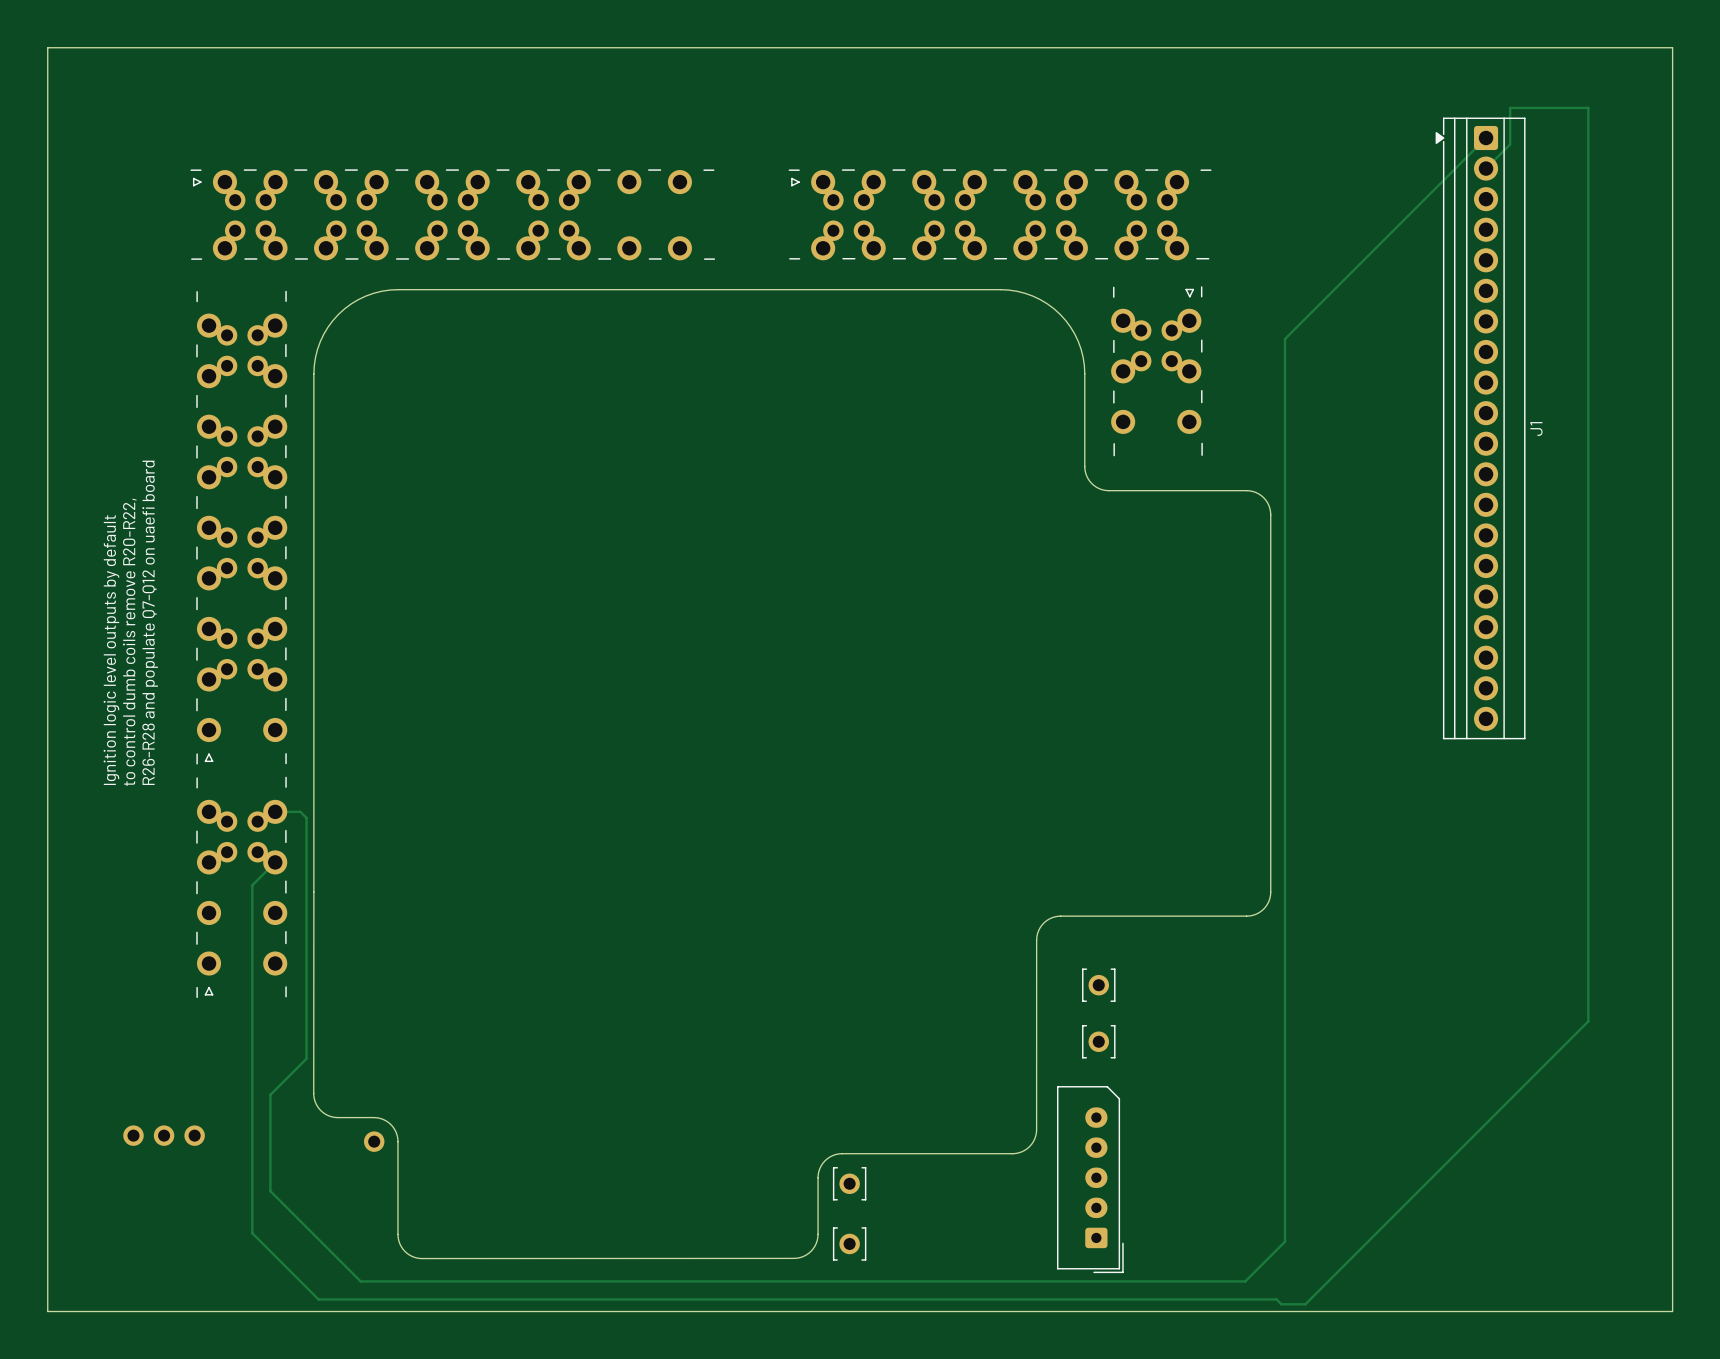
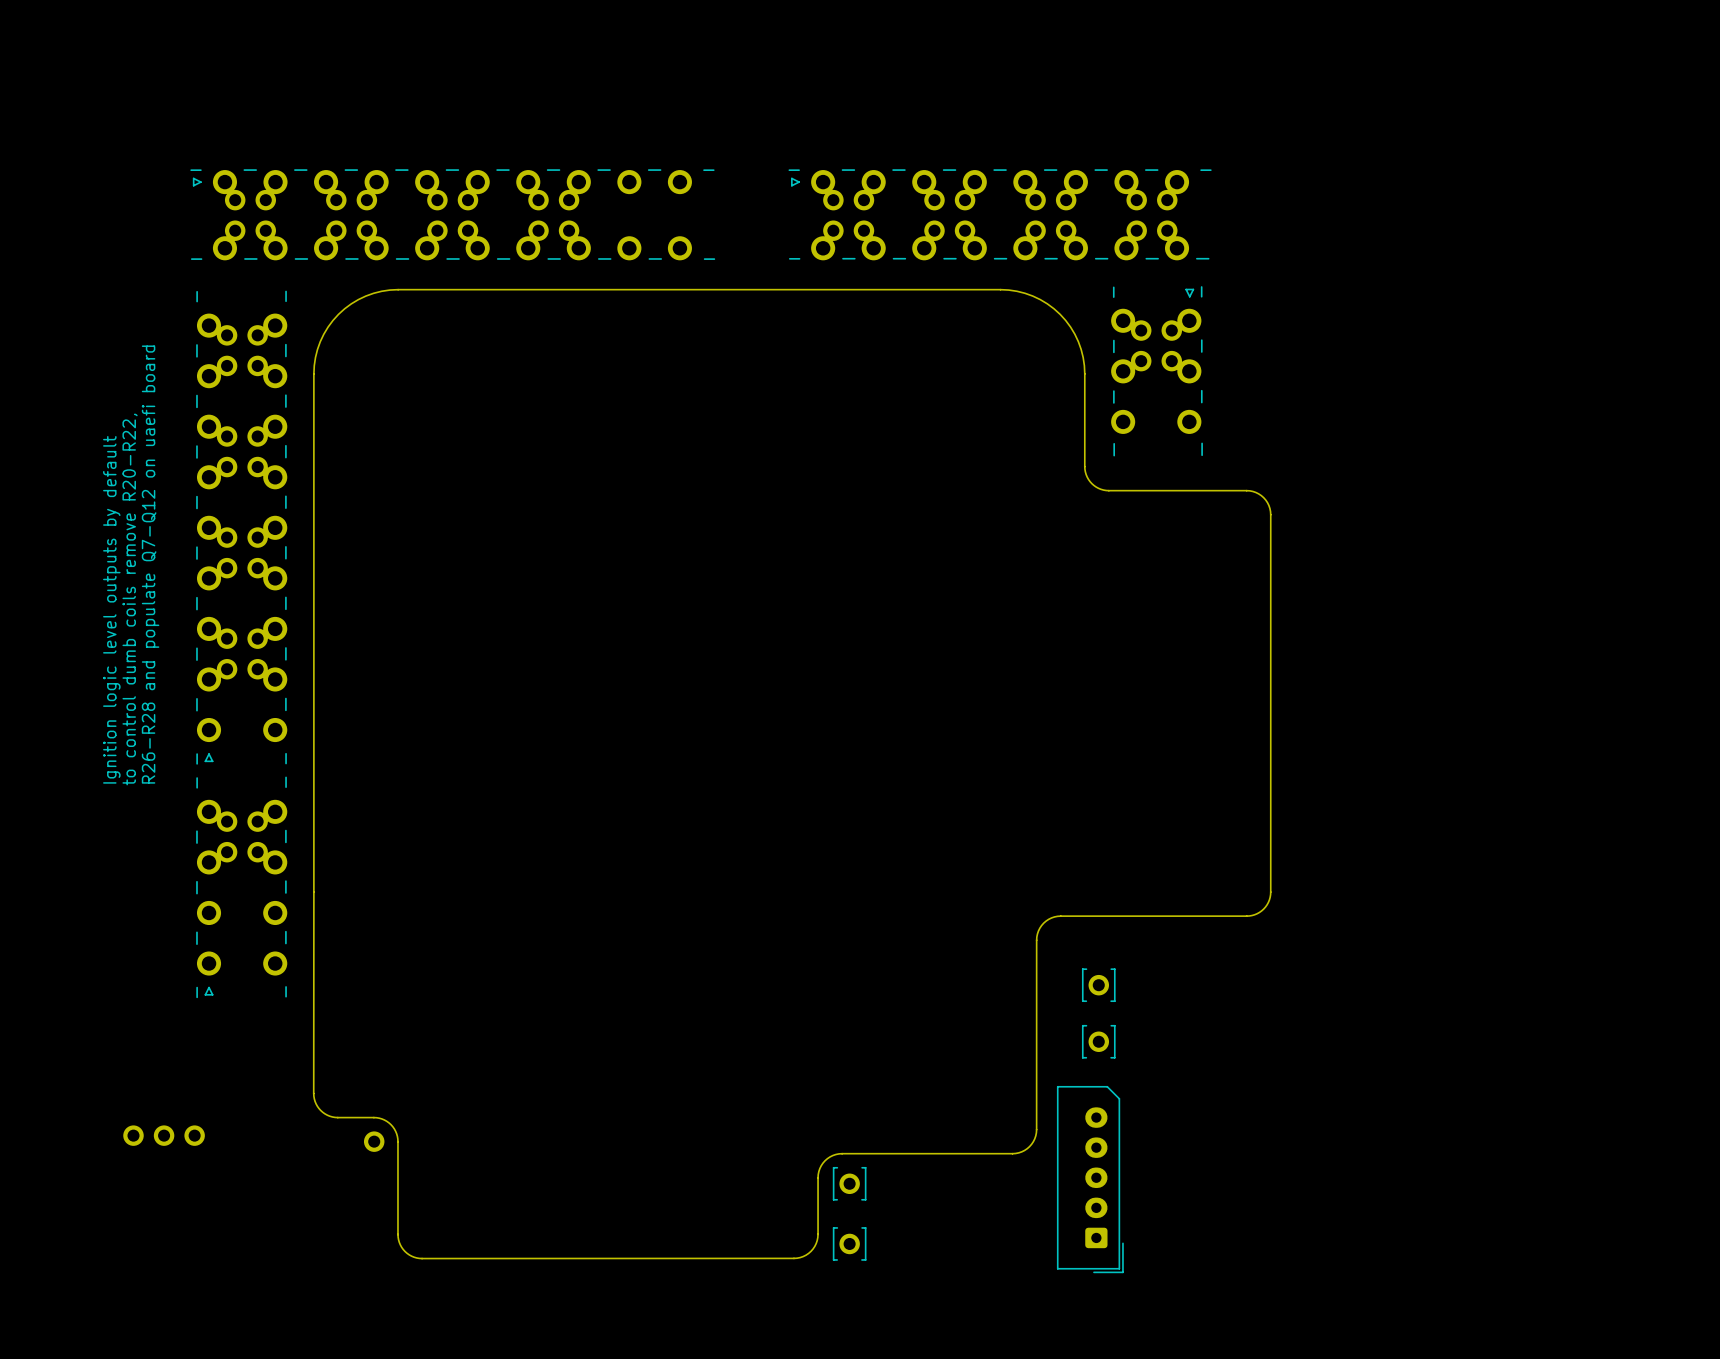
board edge: (47, 47) (1672, 47) (1672, 1311) (47, 1311) (47, 47) -> none
track: (1486, 138) (1285, 339) (1285, 1241) (1245, 1281) (360, 1281) (270, 1191) (270, 1094) (306, 1058) (306, 818) -> none
track: (1486, 168) (1510, 144) (1510, 107) (1588, 107) (1588, 1021) (1305, 1304) (1281, 1304) (1276, 1299) (318, 1299) (252, 1233) (252, 885) (275, 862) -> none
J1: (1480, 428) -> none
track: (275, 811) (300, 811) (306, 818) -> none

